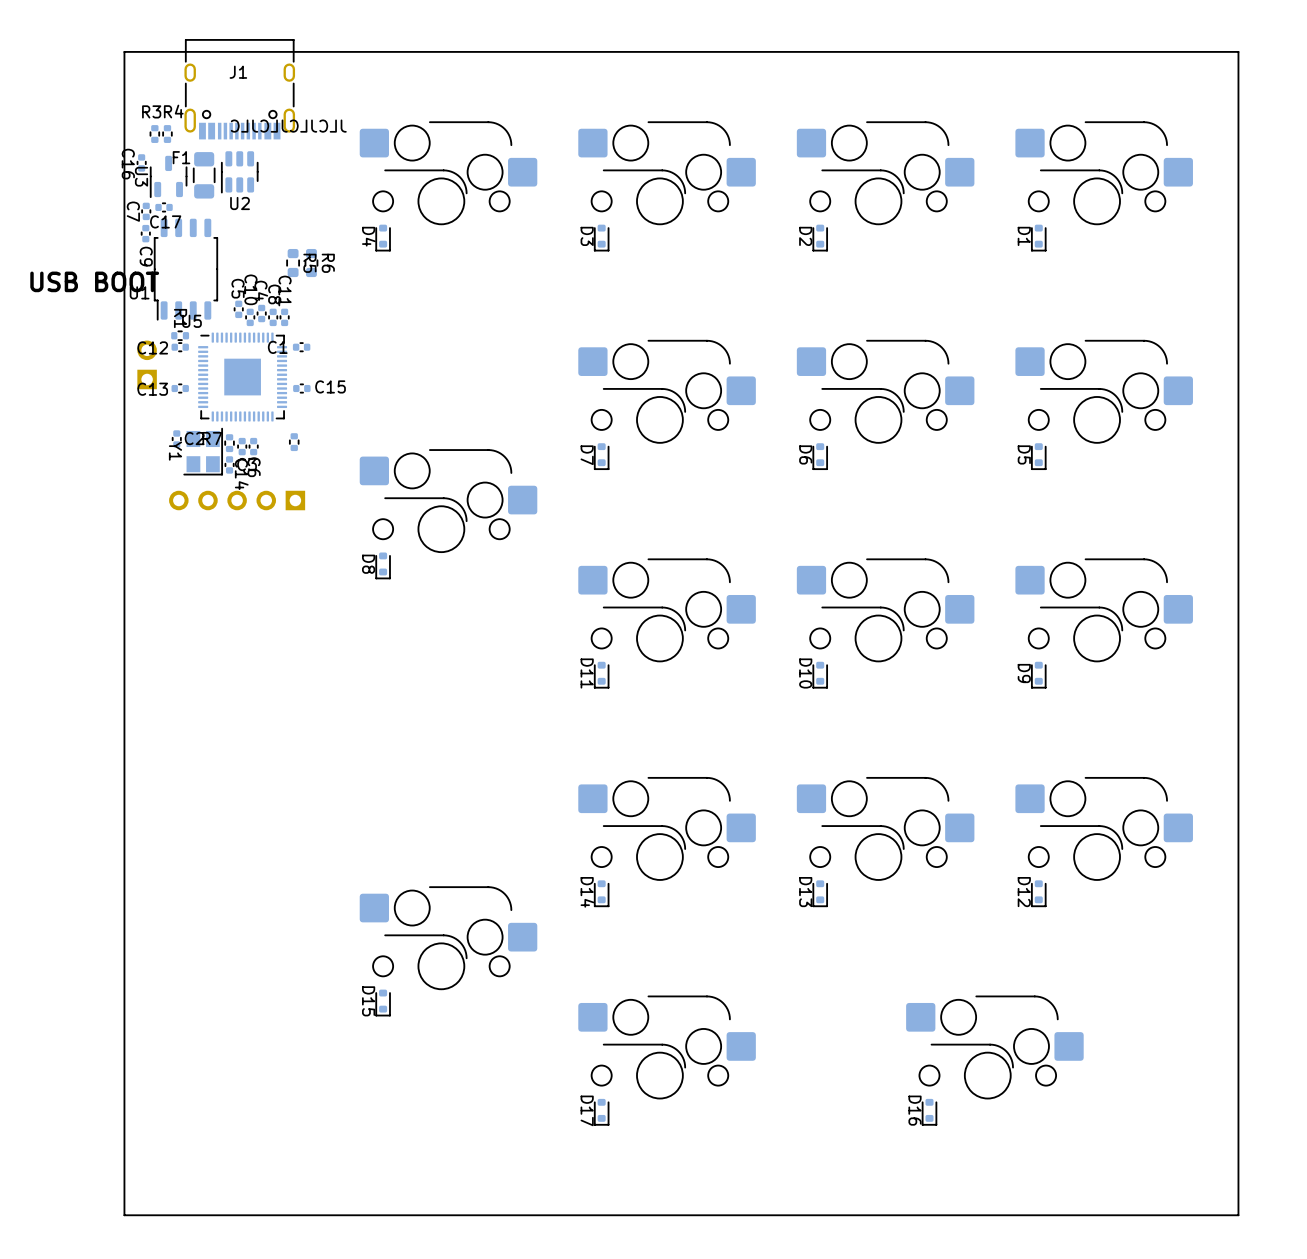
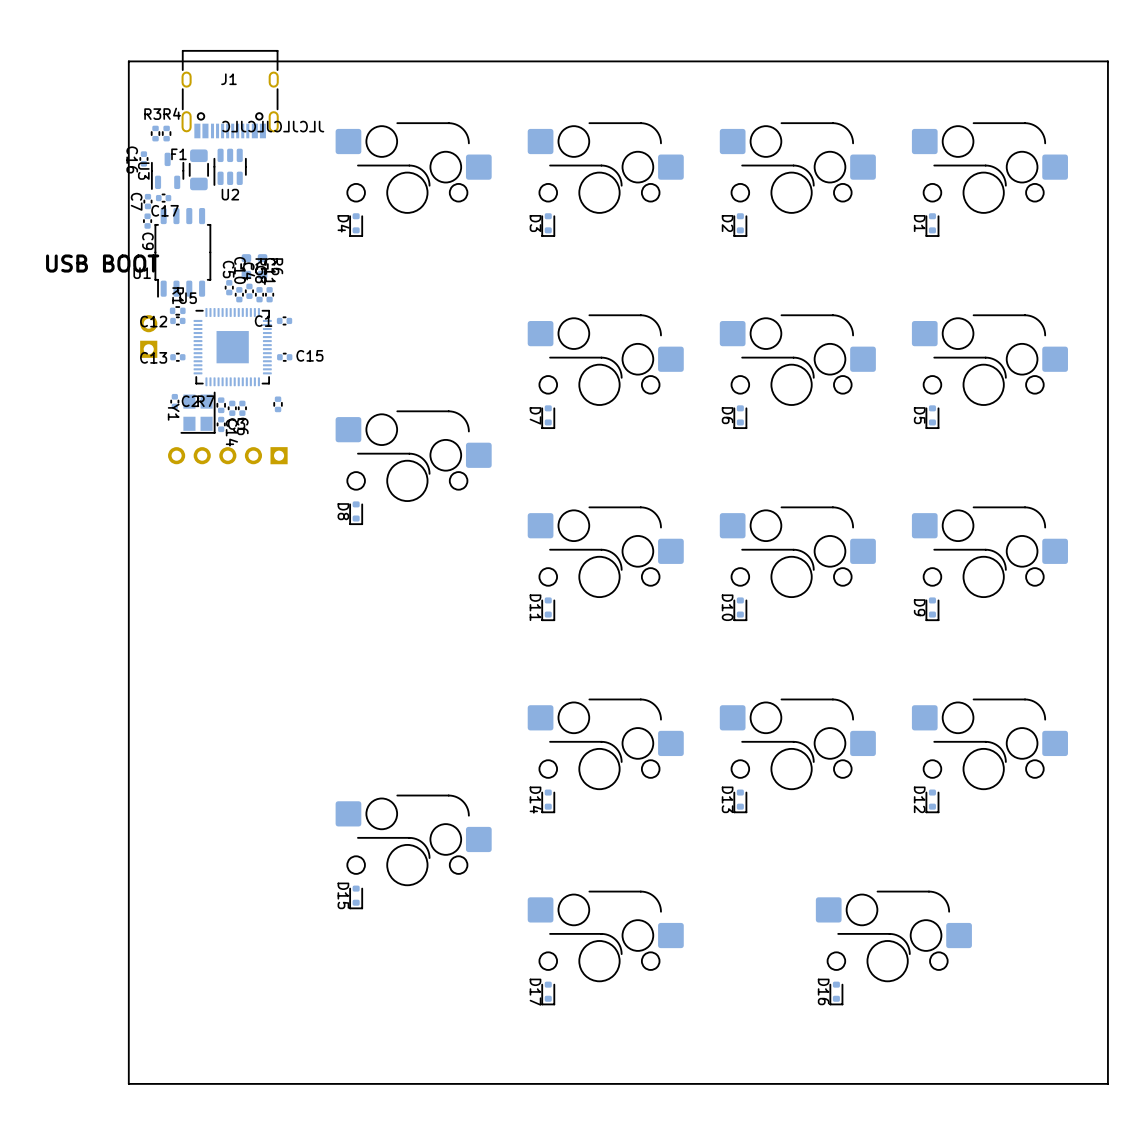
R5 position: (293, 263) -> (246, 266)
R6 position: (311, 263) -> (262, 266)

